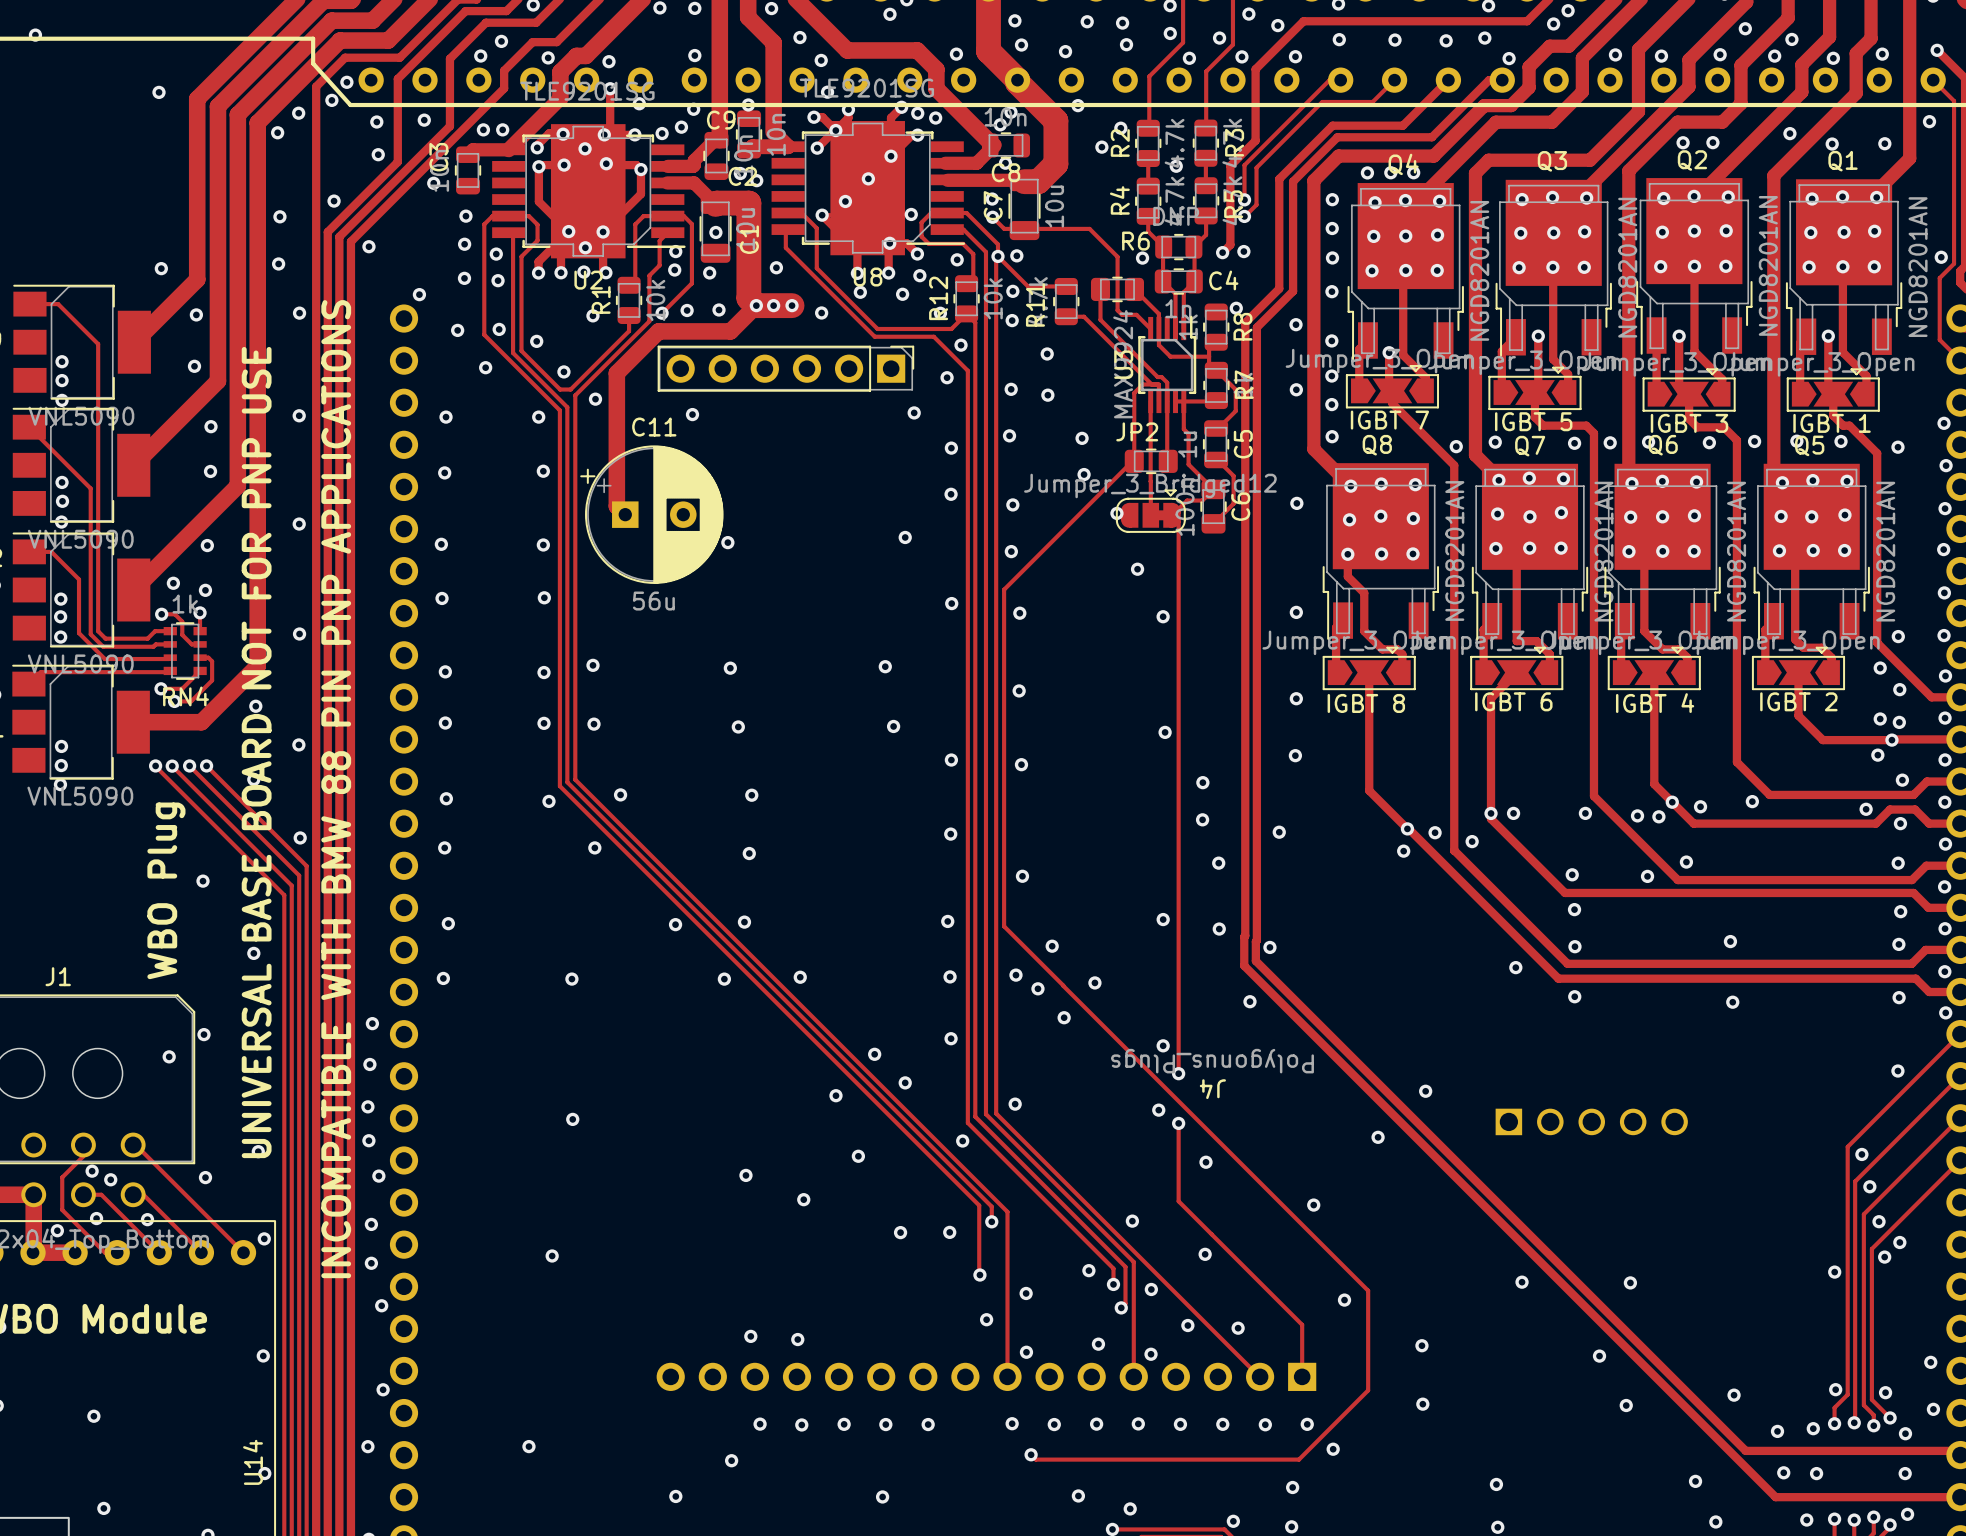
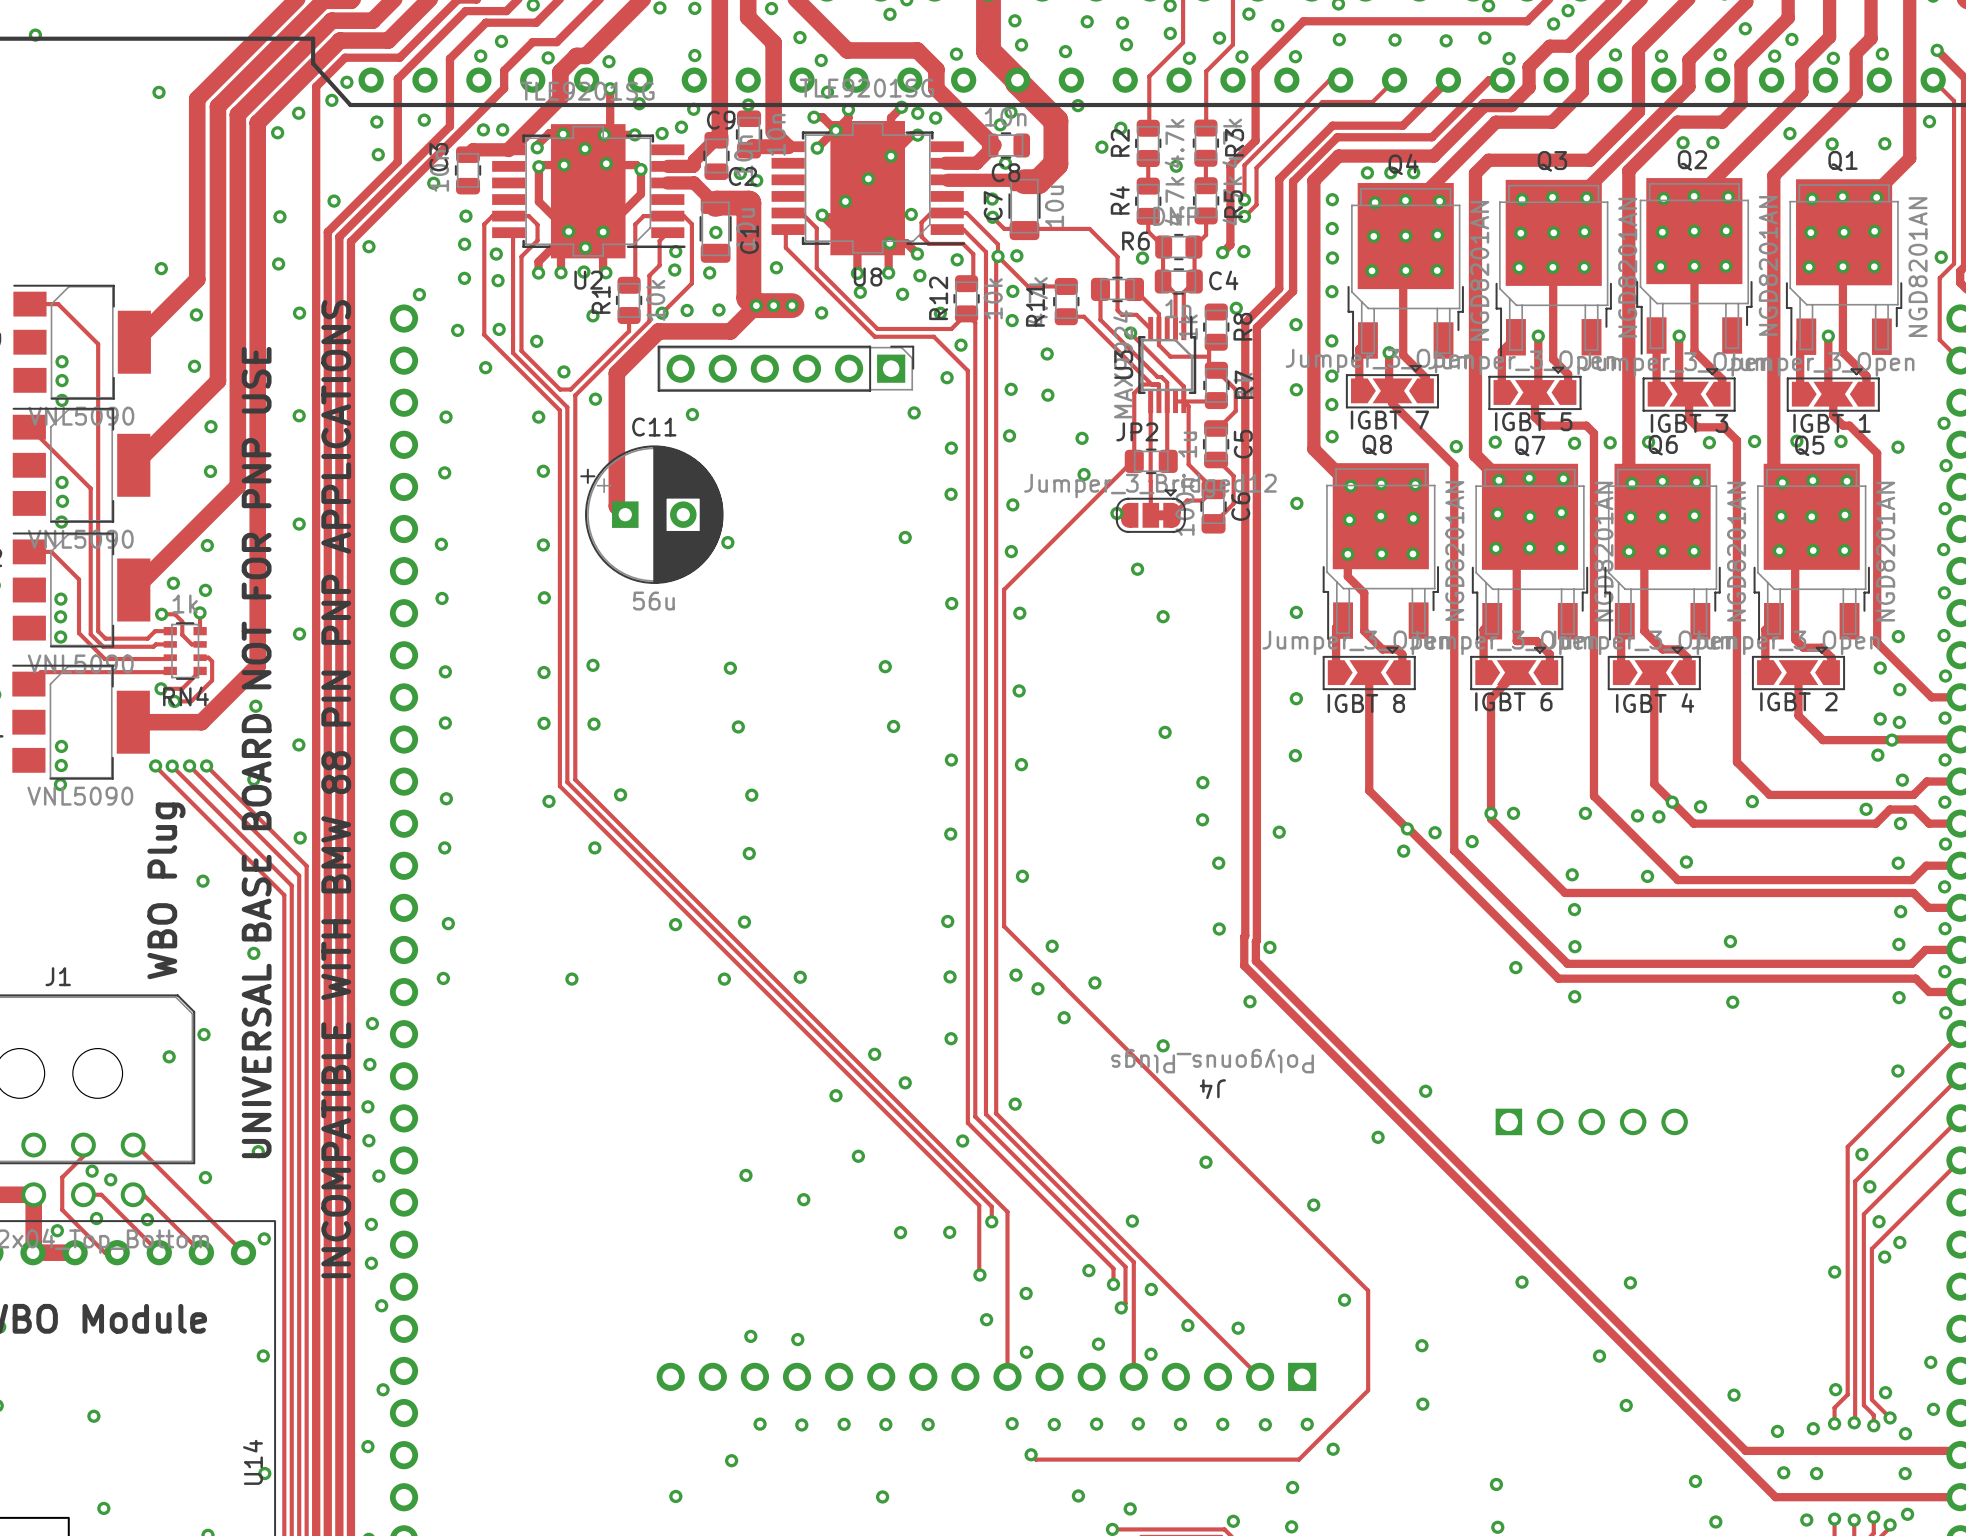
via: none -> (1130, 333)
track: (1183, 401) (1183, 429) (1188, 433) -> (1130, 333) (1183, 386) (1183, 401) (1188, 406) (1188, 433)
track: (1172, 515) (1178, 521) (1178, 1073) -> none
via: (1163, 919) -> none
via: (1178, 1073) -> none
via: (1158, 1110) -> none
via: (572, 1119) -> none
track: (1178, 1123) (1178, 1201) (1302, 1324) (1302, 1376) -> none
via: (1178, 1123) -> none
via: (1205, 1254) -> none
via: (552, 1255) -> none
via: (528, 1446) -> none

